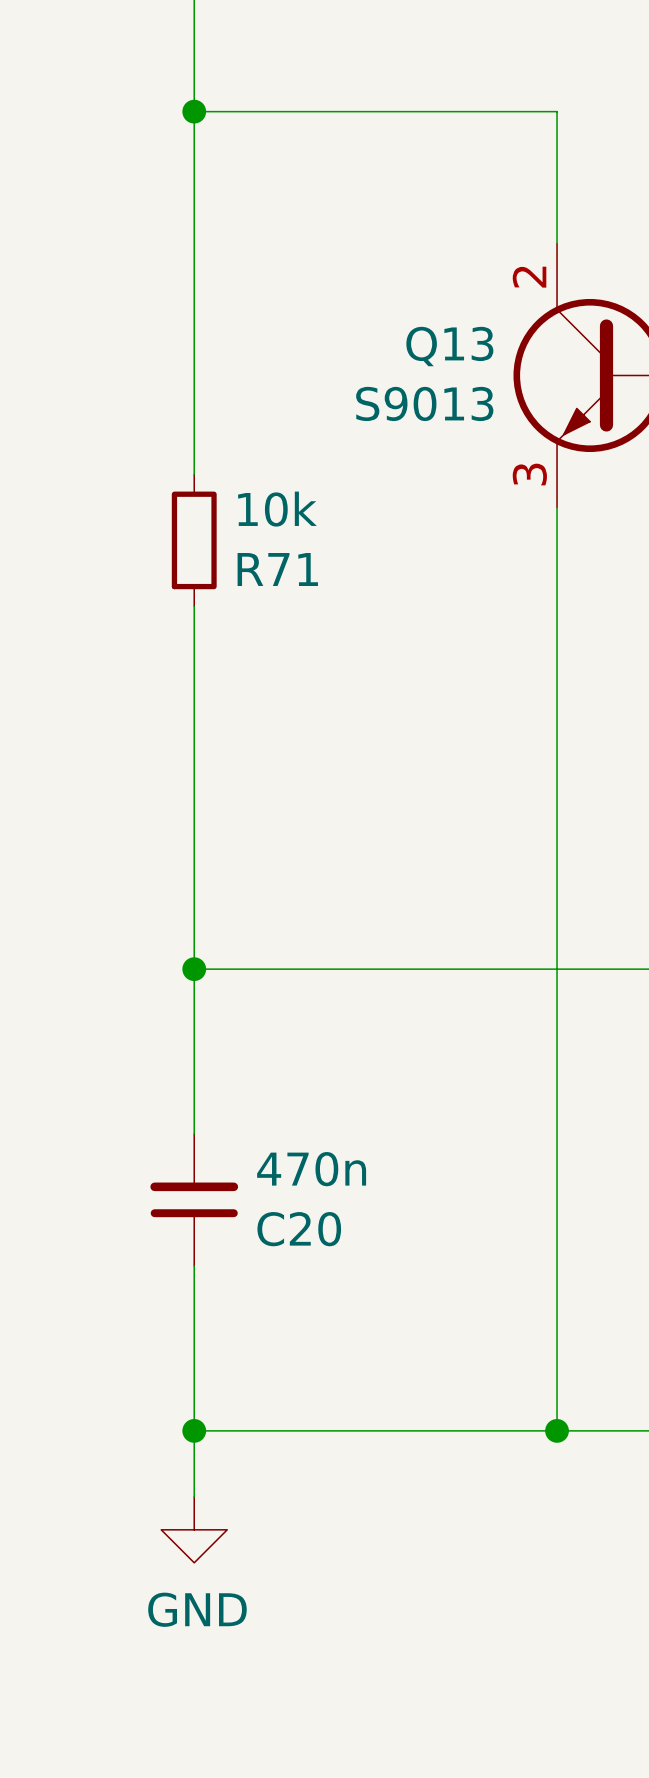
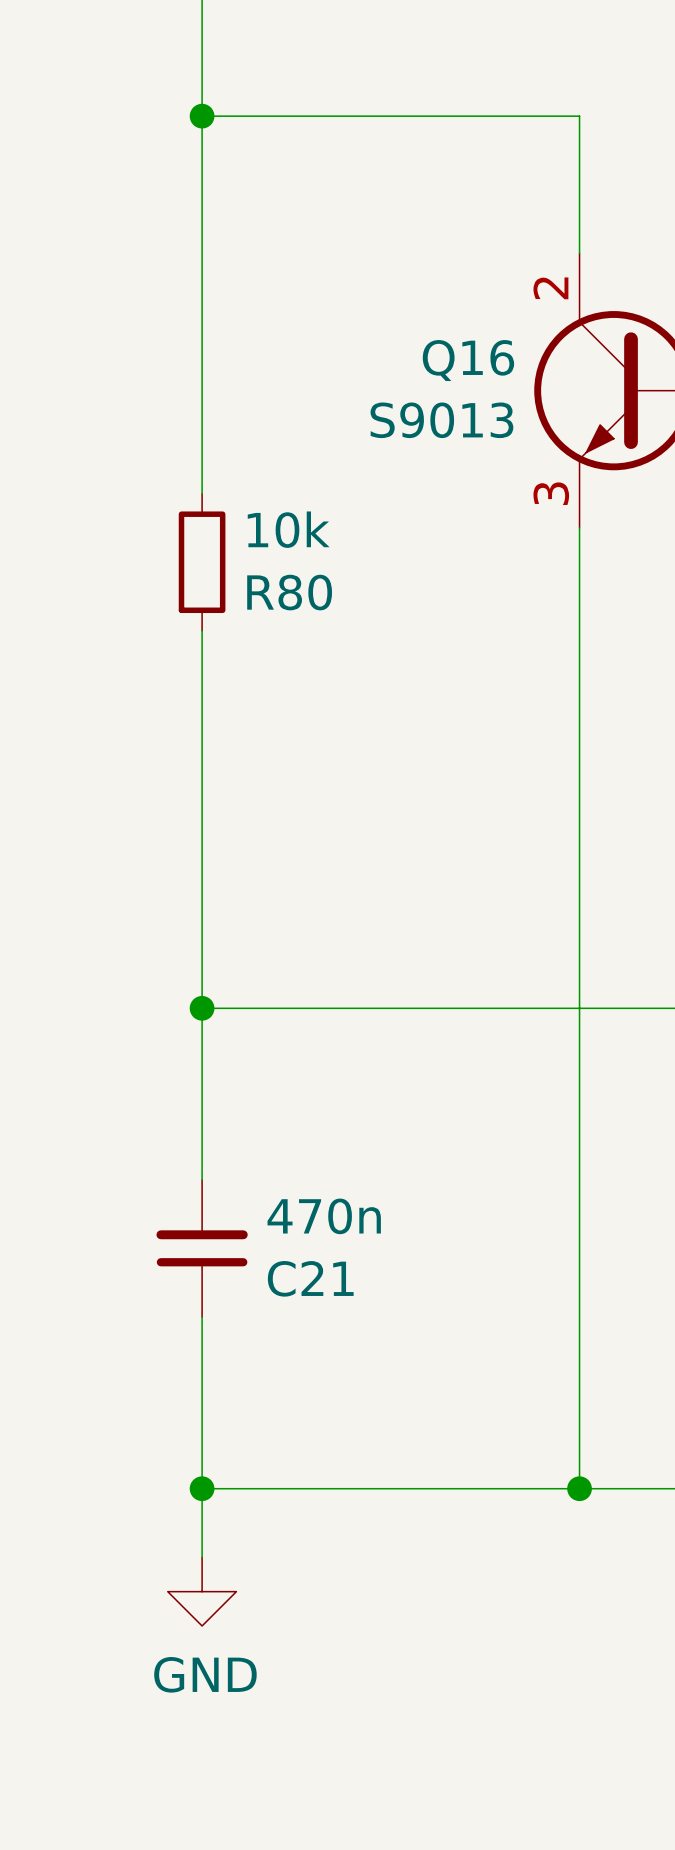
Q13 name: Q13 (449, 346) -> Q16 (468, 360)
R71 name: R71 (277, 569) -> R80 (289, 592)
C20 name: C20 (299, 1229) -> C21 (310, 1278)

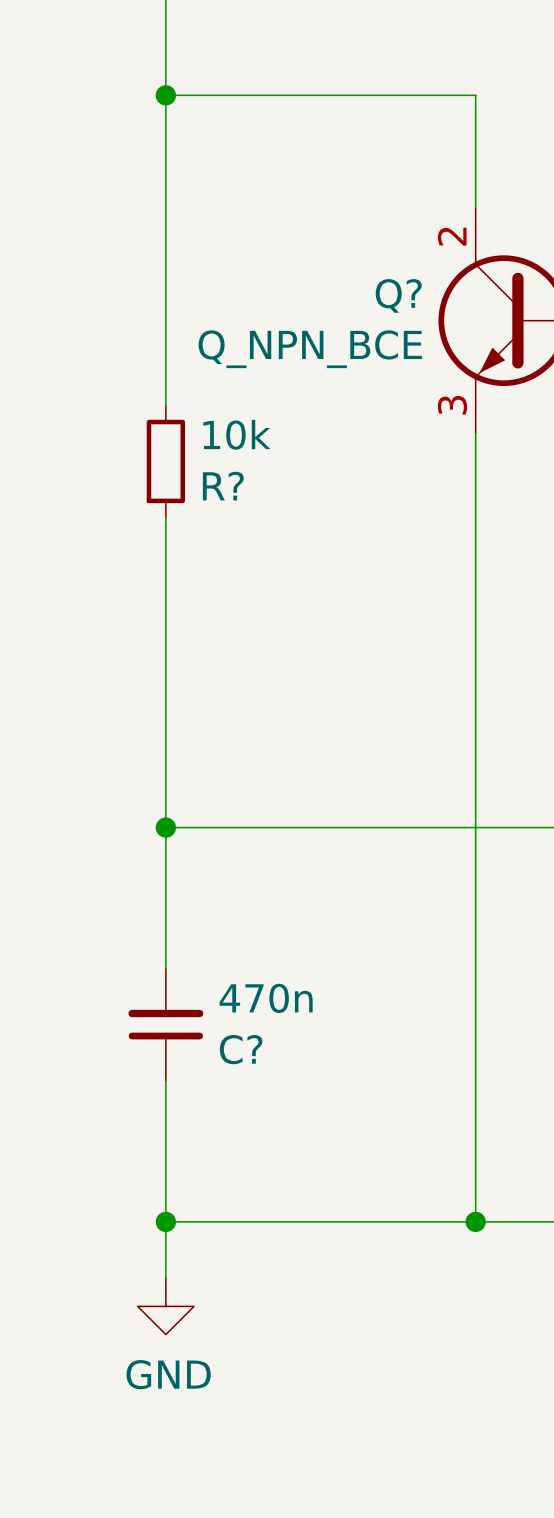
Q16 name: Q16 (468, 360) -> Q? (398, 295)
Q16 value: S9013 (441, 420) -> Q_NPN_BCE (310, 349)
R80 name: R80 (289, 592) -> R? (223, 486)
C21 name: C21 (310, 1278) -> C? (241, 1049)

